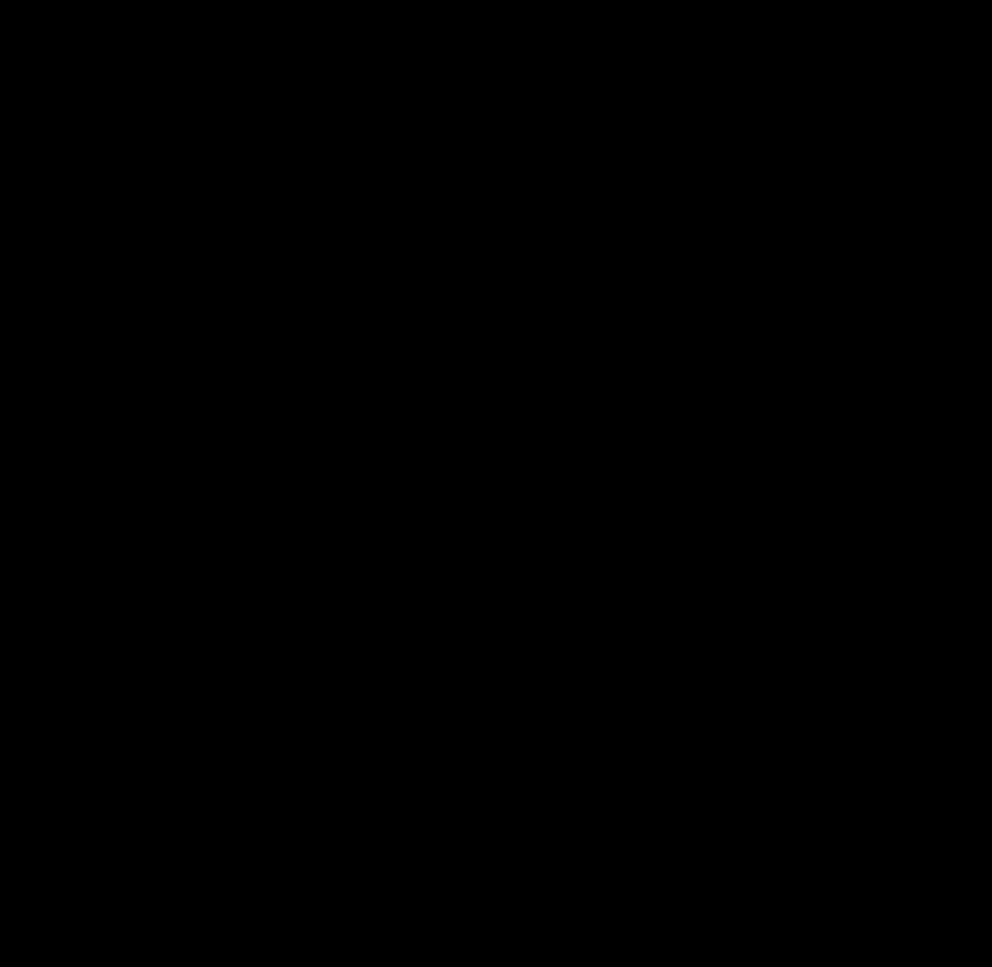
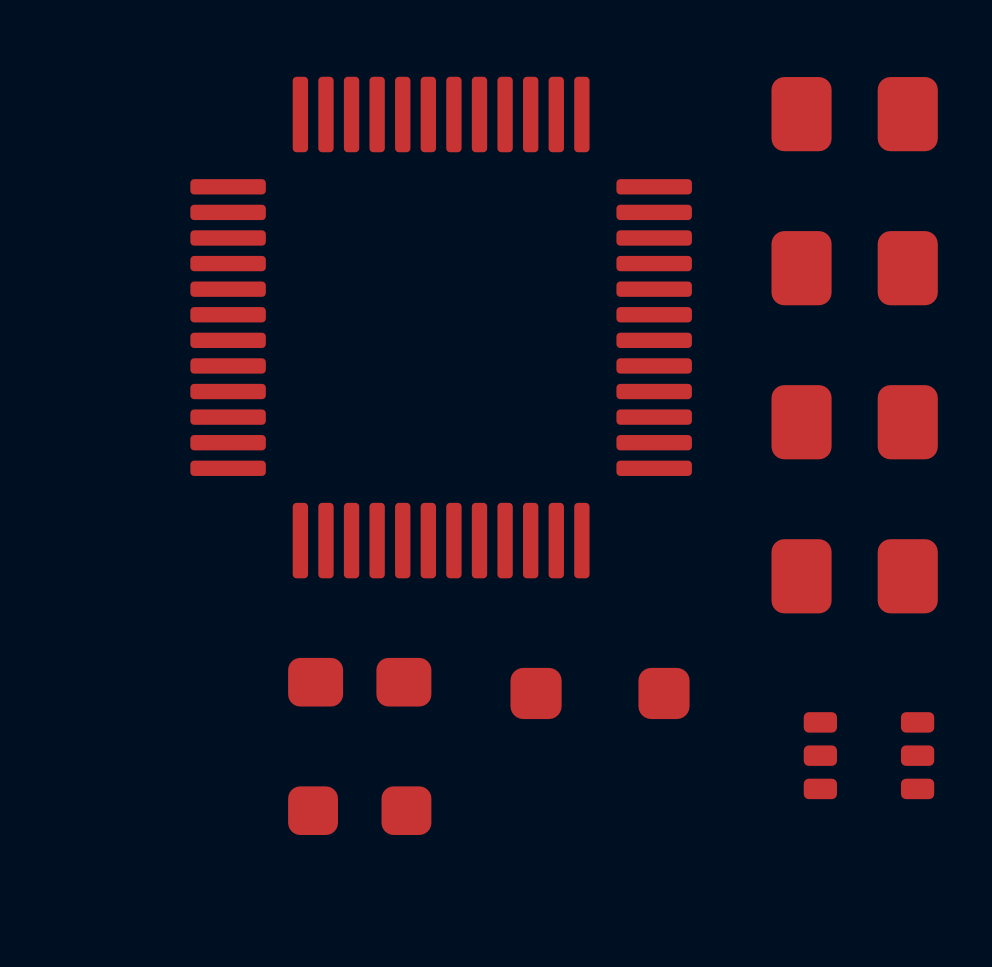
part: none -> (854, 114)
part: none -> (854, 268)
part: none -> (441, 327)
part: none -> (854, 422)
part: none -> (854, 576)
part: none -> (359, 682)
part: none -> (600, 693)
part: none -> (868, 755)
part: none -> (359, 810)

